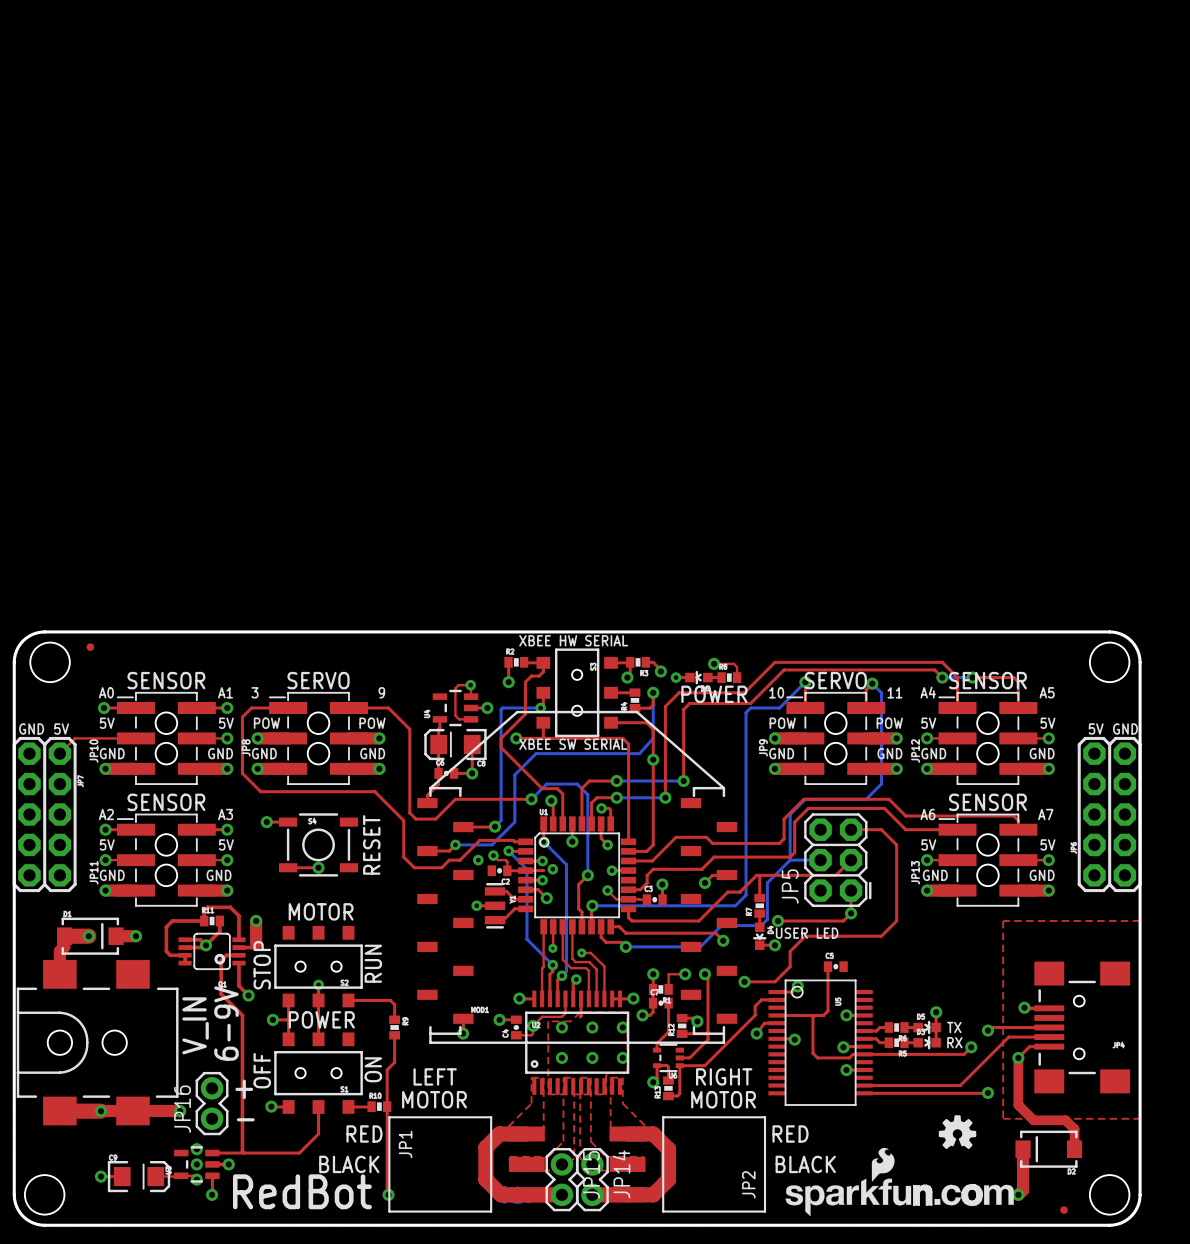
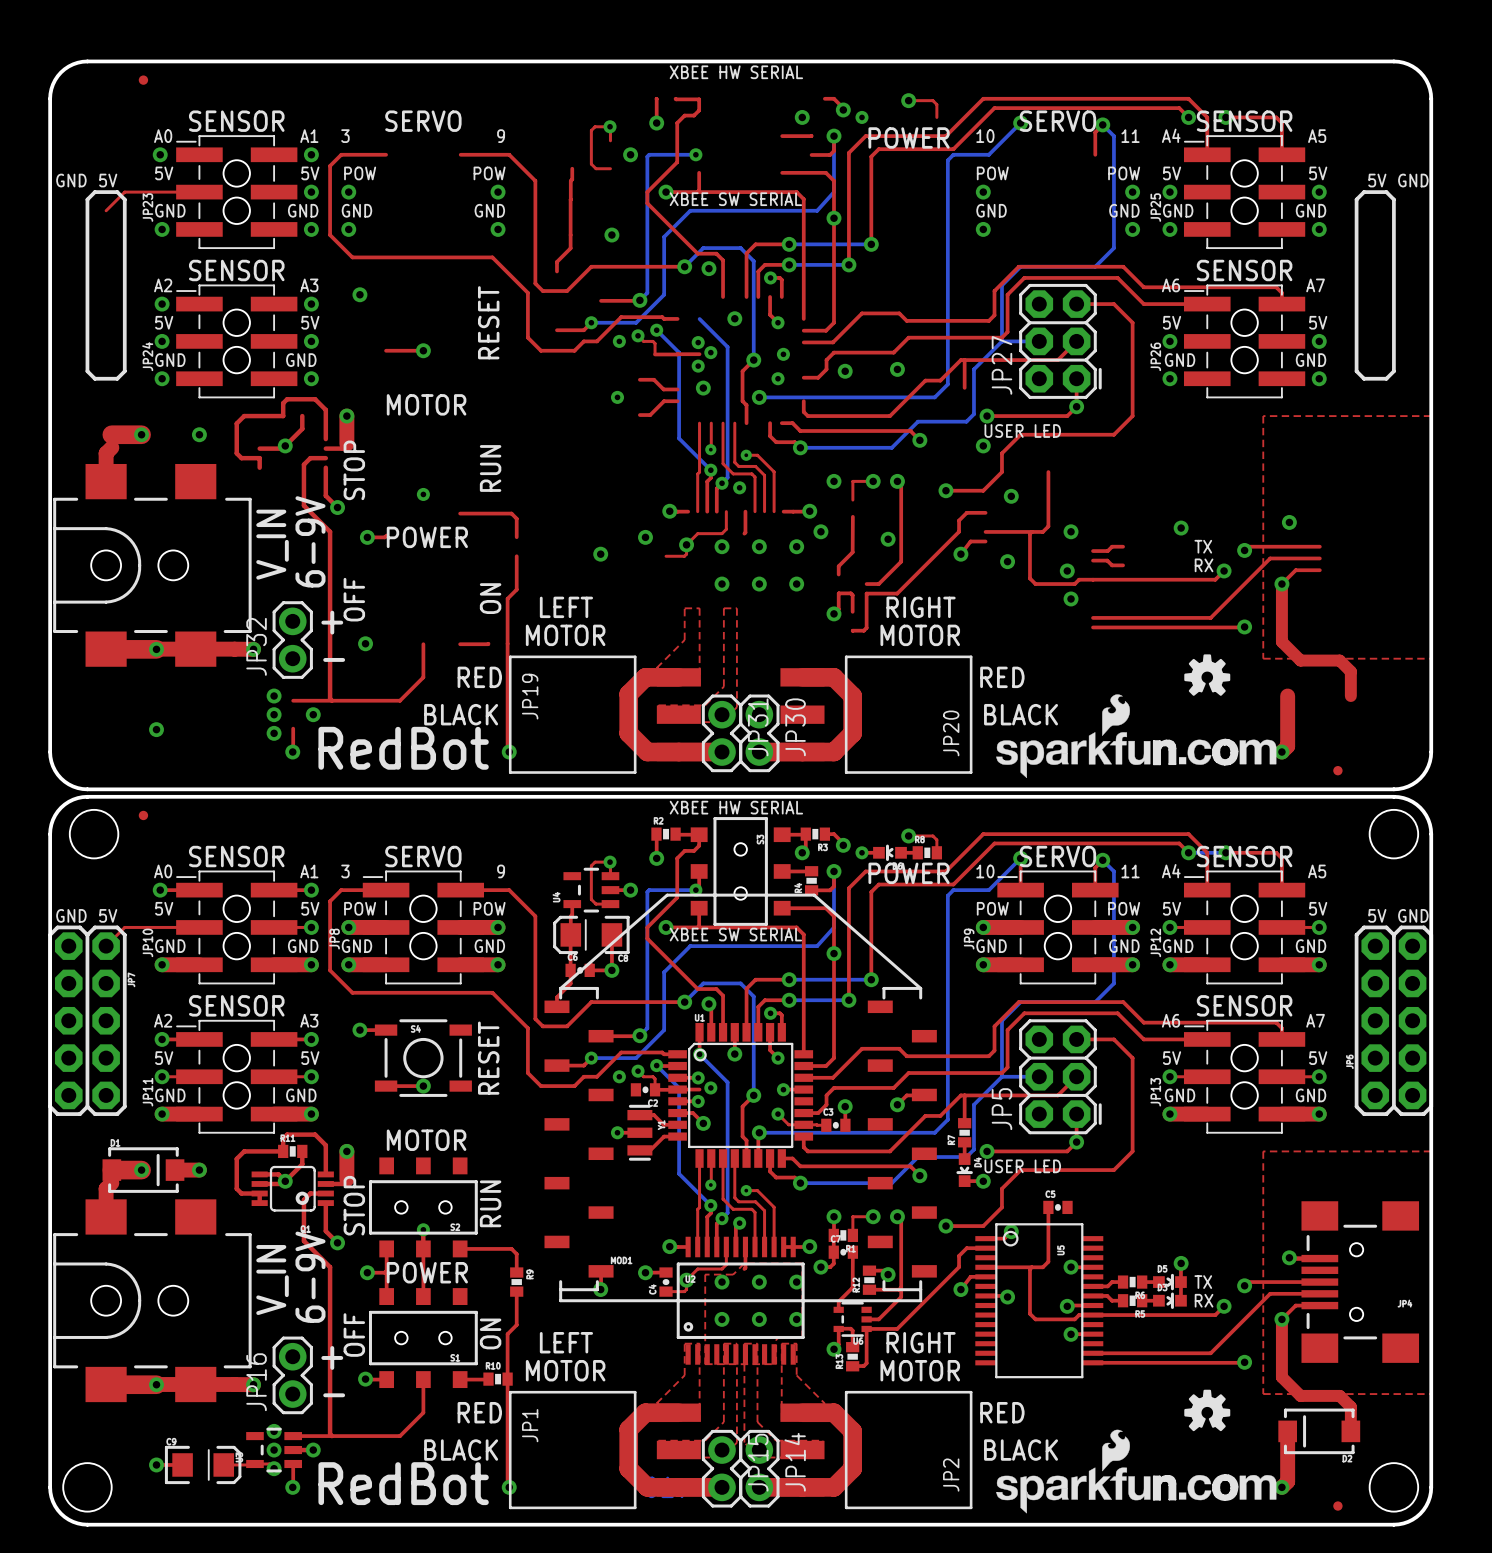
board edge: none -> (87, 61) (1393, 61) (1412, 66) (1426, 80) (1431, 98) (1431, 752) (1426, 770) (1412, 784) (1393, 789) (87, 789) (68, 784) (55, 770) (50, 752) (50, 98) (52, 84) (61, 72) (73, 64) (87, 61)
text: none -> XBEE HW SERIAL (736, 72)
part: none -> (143, 80)
top track: none -> (656, 98) (656, 123)
top track: none -> (675, 98) (699, 99) (699, 110) (694, 115) (684, 115) (677, 123) (677, 162) (647, 192) (647, 203) (697, 253) (716, 253) (723, 260) (723, 296)
top track: none -> (824, 98) (834, 98) (843, 109)
top track: none -> (908, 100) (932, 100) (936, 104) (936, 117)
via: none -> (908, 100)
via: none -> (843, 109)
via: none -> (802, 117)
via: none -> (861, 117)
top track: none -> (1188, 117) (1179, 108) (994, 108) (953, 149) (878, 149) (871, 156) (871, 244)
via: none -> (1188, 117)
top track: none -> (1225, 117) (1276, 117) (1281, 123) (1281, 154)
via: none -> (1225, 117)
text: none -> SENSOR (236, 121)
text: none -> SERVO (423, 121)
text: none -> SERVO (1057, 121)
text: none -> SENSOR (1244, 121)
via: none -> (656, 123)
bottom track: none -> (1020, 123) (988, 154) (953, 154) (947, 160) (947, 384) (934, 397) (759, 397)
via: none -> (1020, 123)
top track: none -> (1102, 124) (1095, 132) (1095, 154)
bottom track: none -> (1102, 124) (1113, 136) (1113, 248) (1095, 266) (1020, 266) (1001, 285) (1001, 341)
via: none -> (1102, 124)
via: none -> (610, 126)
text: none -> A0 (163, 136)
text: none -> A1 (309, 136)
text: none -> 3 (345, 136)
text: none -> 9 (501, 136)
top track: none -> (811, 135) (782, 136)
top track: none -> (834, 136) (834, 151) (830, 154) (811, 154)
bottom track: none -> (834, 136) (834, 192) (817, 210) (690, 210) (664, 236) (664, 294) (636, 322) (591, 322)
via: none -> (834, 136)
text: none -> 10 (985, 136)
text: none -> 11 (1130, 136)
text: none -> A4 (1171, 135)
text: none -> A5 (1317, 136)
text: none -> POWER (909, 137)
top track: none -> (610, 140) (610, 126) (595, 126) (591, 130) (591, 164) (596, 168) (610, 168)
via: none -> (160, 154)
via: none -> (311, 154)
top track: none -> (386, 154) (341, 154) (330, 165) (330, 235) (352, 257) (492, 257) (527, 292) (527, 337) (540, 350) (574, 350) (583, 341) (596, 341) (621, 317) (677, 318)
top track: none -> (460, 154) (509, 154) (535, 180) (535, 283) (542, 291) (567, 291) (591, 266) (684, 266)
via: none -> (630, 154)
bottom track: none -> (695, 154) (649, 154) (647, 156) (647, 292) (639, 300)
via: none -> (695, 154)
top track: none -> (1207, 154) (1207, 117) (1188, 98) (983, 98) (945, 136) (865, 136) (848, 152) (848, 264)
top track: none -> (572, 168) (570, 199)
text: none -> 5V (164, 173)
text: none -> 5V (310, 173)
text: none -> POW (360, 173)
text: none -> POW (489, 173)
top track: none -> (699, 172) (697, 192)
top track: none -> (782, 172) (825, 172) (834, 180) (834, 322) (826, 330) (803, 330)
text: none -> POW (992, 173)
text: none -> POW (1124, 173)
text: none -> 5V (1172, 173)
text: none -> 5V (1318, 173)
text: none -> GND (71, 180)
text: none -> 5V (108, 180)
text: none -> 5V (1377, 180)
text: none -> GND (1413, 180)
line: none -> (94, 192) (117, 192) (124, 199) (124, 371) (117, 378) (94, 378) (87, 371) (87, 199) (94, 192)
top track: none -> (199, 192) (124, 192) (106, 210)
JP23: none -> (236, 192)
via: none -> (311, 192)
via: none -> (348, 192)
via: none -> (498, 192)
top track: none -> (666, 192) (796, 192) (803, 199) (803, 318)
via: none -> (666, 192)
via: none -> (983, 192)
via: none -> (1132, 192)
via: none -> (1169, 192)
JP25: none -> (1244, 192)
via: none -> (1319, 192)
line: none -> (1364, 192) (1386, 192) (1393, 199) (1393, 371) (1386, 378) (1364, 378) (1356, 371) (1356, 199) (1364, 192)
text: none -> XBEE SW SERIAL (735, 199)
top track: none -> (570, 199) (570, 248) (556, 261) (556, 271)
text: none -> GND (170, 210)
text: none -> GND (303, 210)
text: none -> GND (356, 210)
text: none -> GND (489, 210)
text: none -> GND (991, 210)
text: none -> GND (1124, 210)
text: none -> GND (1178, 210)
text: none -> GND (1311, 210)
via: none -> (834, 218)
via: none -> (162, 229)
via: none -> (311, 229)
via: none -> (348, 229)
via: none -> (498, 229)
via: none -> (983, 229)
via: none -> (1132, 229)
via: none -> (1169, 229)
via: none -> (1319, 229)
via: none -> (611, 235)
top track: none -> (789, 244) (755, 244) (746, 253) (746, 296)
bottom track: none -> (789, 244) (871, 244)
via: none -> (789, 244)
via: none -> (871, 244)
top track: none -> (789, 264) (764, 264) (758, 271) (758, 296)
bottom track: none -> (789, 264) (848, 264)
via: none -> (789, 264)
via: none -> (848, 264)
bottom track: none -> (684, 266) (703, 248) (740, 248) (753, 261) (753, 360)
via: none -> (684, 266)
via: none -> (708, 268)
text: none -> SENSOR (236, 270)
text: none -> SENSOR (1244, 270)
top track: none -> (770, 277) (779, 277) (781, 279) (781, 296)
via: none -> (770, 277)
text: none -> A2 (163, 285)
text: none -> A3 (309, 285)
text: none -> A6 (1171, 285)
text: none -> A7 (1315, 285)
via: none -> (359, 294)
top track: none -> (770, 296) (770, 314) (778, 322)
top track: none -> (639, 300) (601, 300)
via: none -> (639, 300)
via: none -> (162, 304)
via: none -> (311, 304)
top track: none -> (1076, 304) (1113, 304) (1132, 322) (1132, 416) (1113, 434) (1020, 434) (1001, 453) (1001, 472) (983, 490) (945, 490)
top track: none -> (1207, 304) (1143, 304) (1117, 277) (1024, 277) (1007, 294) (1007, 332) (1001, 337) (908, 337) (893, 352) (834, 352) (826, 360) (826, 369) (818, 377) (803, 377)
top track: none -> (1281, 304) (1281, 292) (1276, 287) (1143, 287) (1123, 266) (1018, 266) (994, 291) (994, 315) (988, 320) (906, 320) (899, 313) (861, 313) (832, 342) (803, 342)
bottom track: none -> (699, 319) (727, 347) (727, 477) (722, 483)
via: none -> (734, 318)
text: none -> 5V (164, 322)
text: none -> 5V (310, 322)
text: none -> RESET (488, 322)
top track: none -> (591, 322) (583, 330) (556, 330)
via: none -> (591, 322)
via: none -> (778, 322)
text: none -> 5V (1172, 322)
text: none -> 5V (1318, 322)
bottom track: none -> (656, 330) (679, 352) (679, 438) (710, 470)
via: none -> (656, 330)
top track: none -> (638, 335) (643, 341) (652, 341) (655, 343) (655, 354) (699, 354)
via: none -> (638, 335)
via: none -> (162, 341)
JP24: none -> (236, 341)
via: none -> (311, 341)
via: none -> (619, 341)
bottom track: none -> (1001, 341) (973, 369) (973, 414) (966, 421) (917, 421) (891, 447) (800, 447)
bottom track: none -> (1001, 341) (1039, 341)
JP27: none -> (1060, 341)
top track: none -> (1076, 341) (1057, 360) (960, 360) (940, 380) (925, 380) (889, 416) (807, 416) (803, 411) (803, 401)
via: none -> (1169, 341)
JP26: none -> (1244, 341)
via: none -> (1319, 341)
via: none -> (698, 342)
top track: none -> (386, 350) (423, 350)
via: none -> (423, 350)
via: none -> (710, 352)
via: none -> (783, 354)
text: none -> GND (170, 360)
text: none -> GND (301, 360)
top track: none -> (753, 360) (742, 371) (742, 401) (746, 405) (746, 423)
via: none -> (753, 360)
top track: none -> (964, 360) (964, 387)
text: none -> GND (1180, 360)
text: none -> GND (1311, 360)
via: none -> (698, 366)
via: none -> (897, 369)
via: none -> (845, 371)
via: none -> (162, 378)
via: none -> (311, 378)
top track: none -> (639, 379) (653, 379) (663, 389) (677, 389)
via: none -> (778, 378)
top track: none -> (1076, 378) (1076, 406) (1067, 416) (987, 416)
via: none -> (1169, 378)
via: none -> (1319, 378)
via: none -> (703, 388)
via: none -> (617, 397)
via: none -> (759, 397)
top track: none -> (677, 401) (664, 401) (650, 415) (639, 415)
text: none -> MOTOR (426, 404)
via: none -> (1076, 406)
top track: none -> (302, 416) (302, 428) (282, 448) (259, 448)
top track: none -> (346, 416) (346, 444) (342, 448) (325, 448)
via: none -> (346, 416)
via: none -> (987, 416)
top zone outline: none -> (1431, 416) (1263, 416) (1263, 658) (1431, 658)
top track: none -> (699, 423) (699, 471)
top track: none -> (711, 423) (710, 449)
top track: none -> (723, 423) (723, 463) (733, 473) (751, 473) (755, 477) (755, 511)
top track: none -> (734, 423) (734, 462) (738, 466) (755, 466) (764, 475) (764, 511)
top track: none -> (770, 423) (770, 436) (776, 442) (794, 442) (800, 447)
top track: none -> (781, 423) (792, 423) (800, 431) (910, 431) (919, 440)
text: none -> USER LED (1022, 431)
top track: none -> (141, 434) (111, 434) (111, 447) (106, 453) (106, 481)
via: none -> (141, 434)
via: none -> (199, 434)
top track: none -> (325, 439) (325, 409) (315, 399) (287, 399) (283, 403) (283, 416) (244, 416) (236, 423) (236, 453) (241, 458) (259, 458) (259, 467)
via: none -> (919, 440)
via: none -> (285, 445)
via: none -> (983, 445)
via: none -> (800, 447)
via: none -> (710, 449)
top track: none -> (746, 455) (757, 455) (774, 471) (774, 511)
via: none -> (746, 455)
top track: none -> (325, 458) (310, 458) (303, 464) (303, 505) (330, 531) (330, 698) (331, 700)
top track: none -> (325, 467) (325, 495) (337, 507)
text: none -> RUN (490, 468)
text: none -> STOP (354, 470)
top track: none -> (710, 470) (710, 477) (707, 481) (707, 511)
via: none -> (710, 470)
top track: none -> (699, 472) (697, 473) (697, 511)
top track: none -> (1048, 472) (1048, 526) (1042, 531) (985, 531)
via: none -> (834, 481)
top track: none -> (873, 481) (852, 481) (852, 500)
via: none -> (873, 481)
top track: none -> (897, 481) (901, 485) (901, 561) (878, 584) (866, 584)
via: none -> (897, 481)
top track: none -> (722, 483) (716, 488) (716, 511)
via: none -> (722, 483)
via: none -> (739, 487)
via: none -> (945, 490)
via: none -> (423, 494)
via: none -> (1011, 496)
via: none -> (337, 507)
top track: none -> (669, 511) (688, 511)
via: none -> (669, 511)
top track: none -> (726, 511) (726, 529) (722, 533) (697, 533) (686, 544) (686, 554) (684, 556) (666, 556)
top track: none -> (745, 511) (744, 533)
top track: none -> (809, 511) (783, 511)
via: none -> (809, 511)
top track: none -> (985, 512) (966, 512) (959, 520) (959, 531) (897, 593) (866, 593) (866, 627) (863, 630) (852, 630)
top track: none -> (460, 513) (511, 513) (516, 518) (516, 537)
top track: none -> (852, 516) (852, 552) (838, 566) (838, 574)
via: none -> (1289, 522)
via: none -> (1181, 528)
via: none -> (820, 531)
via: none -> (1071, 531)
top track: none -> (1031, 531) (1029, 533) (1029, 578) (1035, 584) (1074, 584) (1079, 579) (1215, 579) (1224, 570)
top track: none -> (386, 535) (384, 537) (367, 537)
via: none -> (367, 537)
text: none -> POWER (427, 537)
via: none -> (645, 537)
via: none -> (888, 539)
top track: none -> (985, 541) (970, 541) (960, 554)
text: none -> 6-9V (310, 541)
text: none -> V_IN (272, 544)
via: none -> (686, 544)
via: none -> (722, 546)
via: none -> (759, 546)
via: none -> (796, 546)
top track: none -> (1123, 546) (1112, 546) (1107, 551) (1093, 551)
text: none -> TX (1203, 546)
top track: none -> (1319, 546) (1248, 546) (1244, 550)
via: none -> (1244, 550)
via: none -> (600, 554)
via: none -> (960, 554)
top track: none -> (516, 556) (516, 589) (507, 598) (507, 750) (509, 752)
top track: none -> (1319, 558) (1270, 558) (1210, 617) (1093, 617)
top track: none -> (1093, 560) (1107, 560) (1112, 565) (1123, 565)
via: none -> (1007, 561)
part: none -> (152, 565)
text: none -> RX (1204, 565)
via: none -> (1067, 570)
via: none -> (1224, 570)
top track: none -> (1319, 570) (1295, 570) (1281, 584) (1281, 641) (1300, 660) (1339, 660) (1350, 671) (1350, 696)
via: none -> (722, 584)
via: none -> (759, 584)
via: none -> (796, 584)
via: none -> (1281, 584)
text: none -> ON (490, 598)
via: none -> (1071, 598)
text: none -> OFF (354, 599)
text: none -> LEFT (566, 607)
text: none -> RIGHT (921, 607)
top zone outline: none -> (684, 608) (699, 608) (699, 684) (658, 684) (658, 668) (656, 668) (684, 640) (684, 608)
top zone outline: none -> (723, 608) (736, 608) (736, 707) (722, 722) (658, 722) (658, 705) (705, 705) (723, 686) (723, 608)
top track: none -> (852, 611) (852, 595) (850, 593) (838, 593) (838, 609) (834, 613)
via: none -> (834, 613)
text: none -> + (332, 622)
top track: none -> (1244, 626) (1093, 627)
via: none -> (1244, 626)
text: none -> MOTOR (565, 635)
text: none -> MOTOR (920, 635)
JP32: none -> (292, 640)
via: none -> (365, 643)
top track: none -> (423, 644) (423, 677) (400, 700) (293, 700)
top track: none -> (488, 643) (460, 644)
top track: none -> (106, 649) (253, 649)
via: none -> (156, 649)
via: none -> (253, 649)
drawing: none -> [996, 654, 1277, 779]
text: none -> - (334, 659)
text: none -> RED (479, 677)
top track: none -> (678, 677) (645, 677) (628, 694) (628, 733) (647, 752) (722, 752)
top track: none -> (802, 677) (834, 677) (852, 696) (852, 733) (834, 752) (759, 752)
text: none -> RED (1002, 677)
via: none -> (274, 696)
top track: none -> (1287, 696) (1287, 746) (1281, 752)
via: none -> (274, 714)
via: none -> (313, 714)
text: none -> BLACK (461, 714)
JP19: none -> (604, 714)
JP20: none -> (876, 714)
text: none -> BLACK (1021, 714)
top track: none -> (293, 728) (292, 752)
via: none -> (156, 729)
via: none -> (274, 733)
JP31: none -> (722, 733)
JP30: none -> (759, 733)
text: none -> RedBot (403, 748)
via: none -> (292, 752)
via: none -> (509, 752)
via: none -> (1281, 752)
part: none -> (1337, 770)

